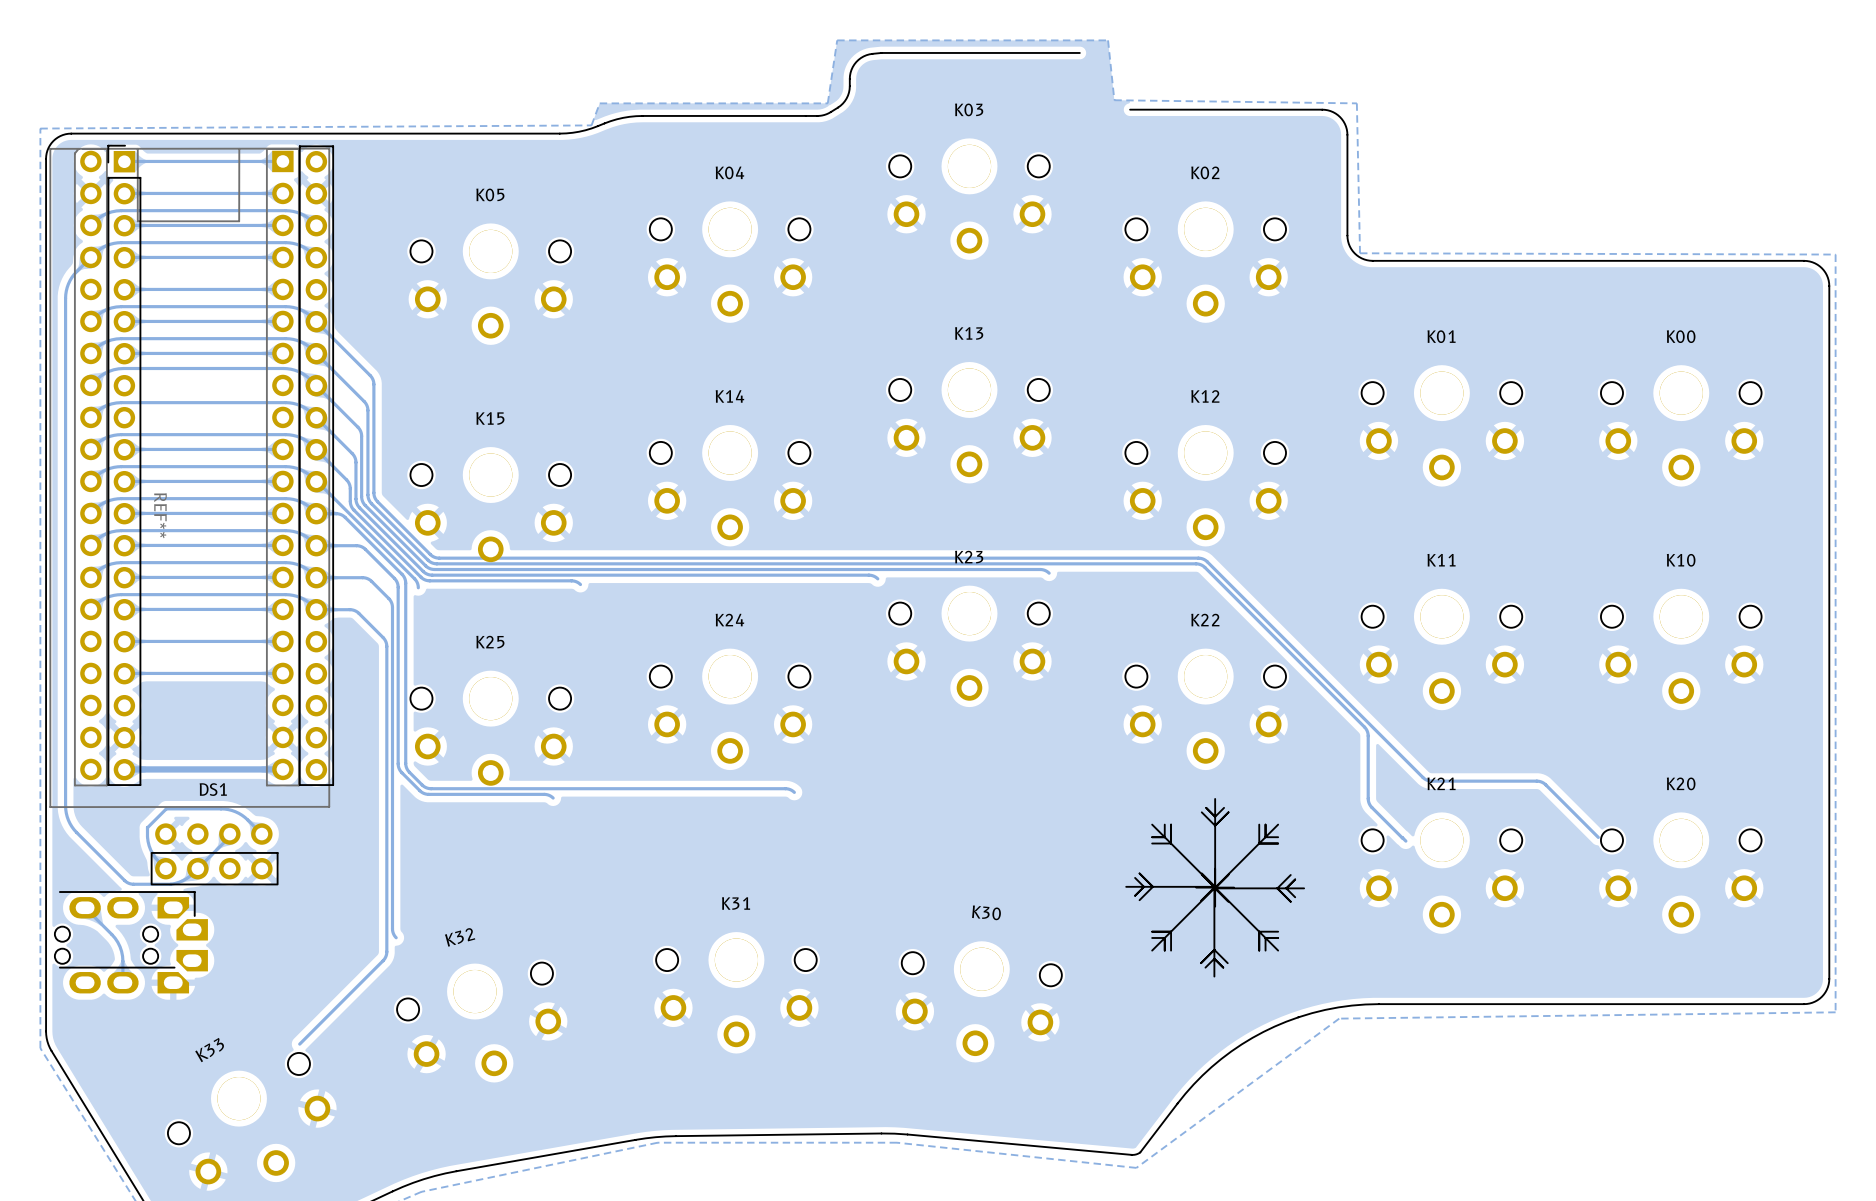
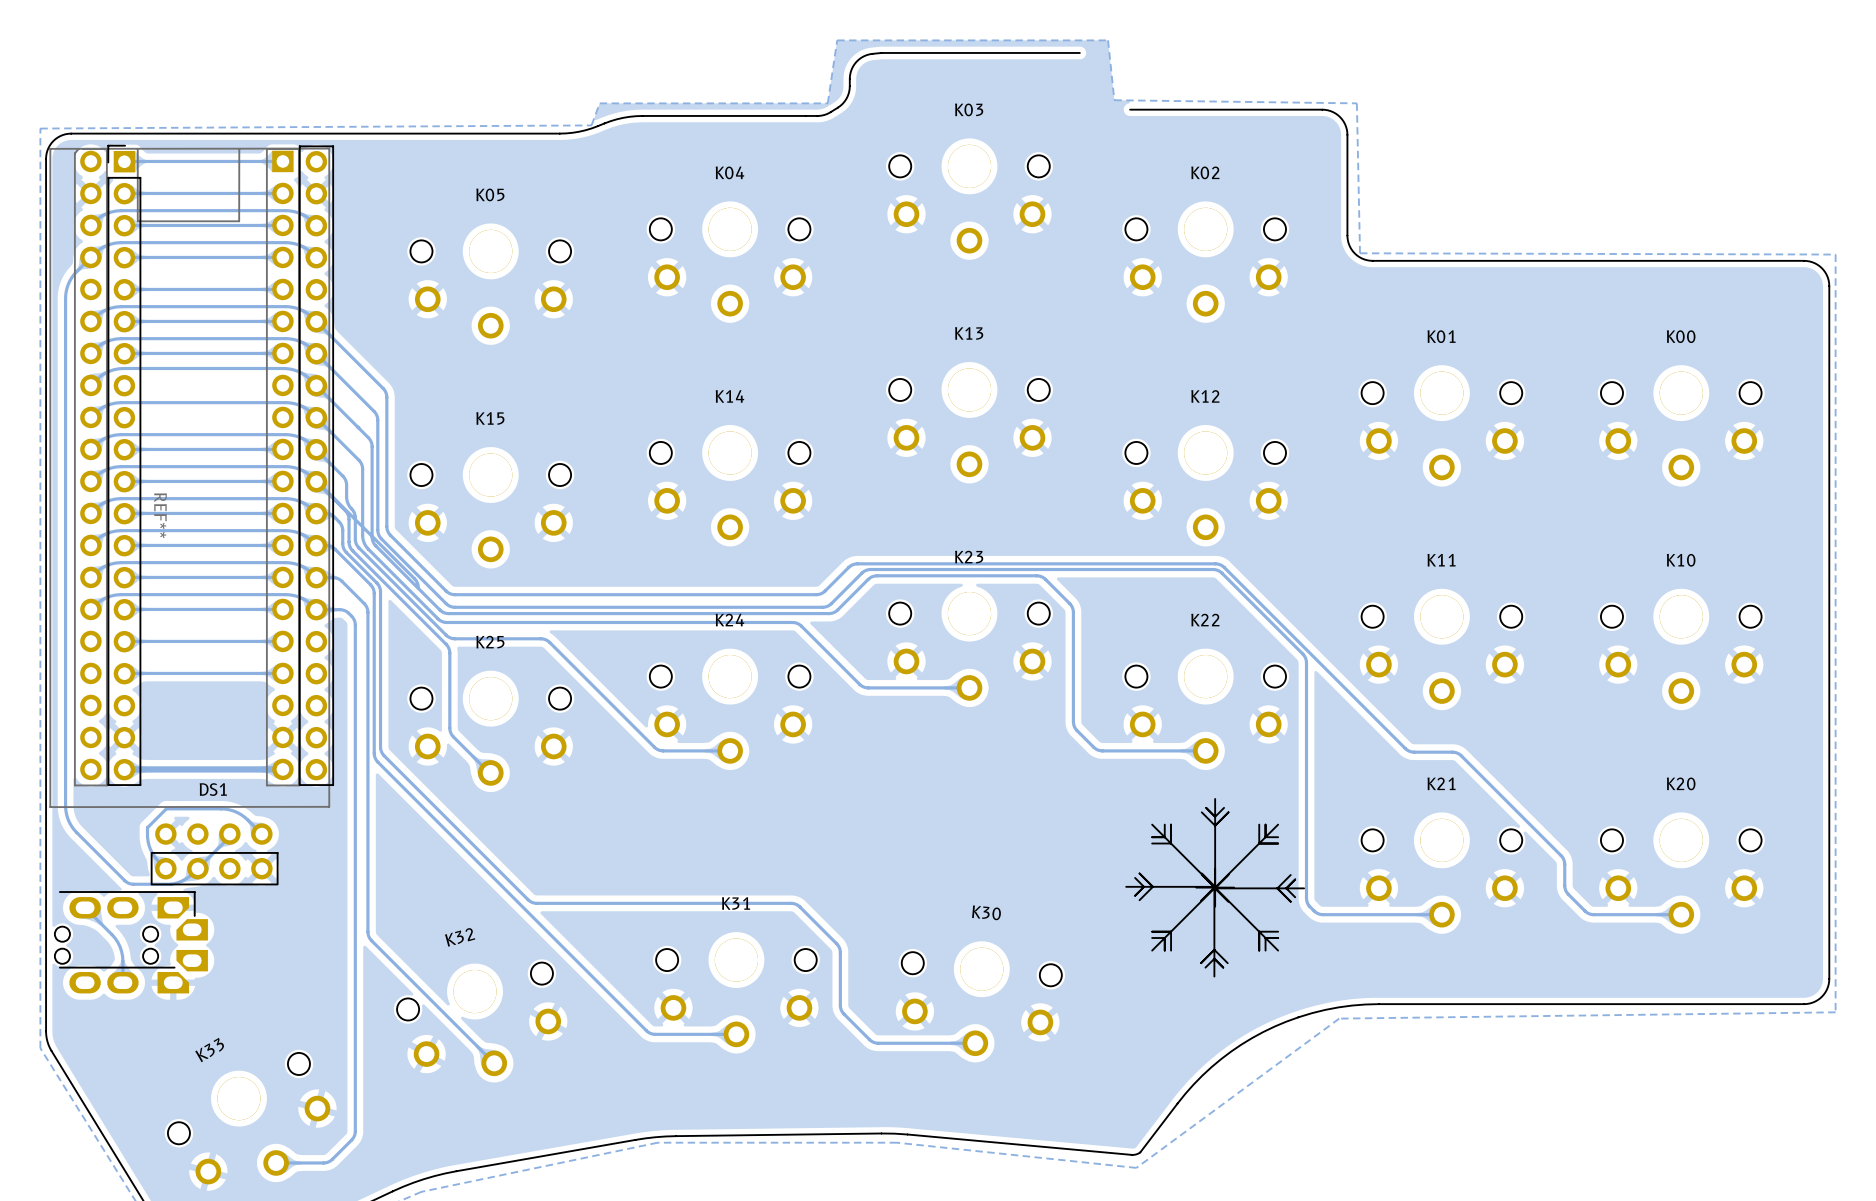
track: (370, 375) (373, 384) (374, 496) (434, 557) (1200, 558) (1207, 561) (1424, 779) (1431, 781) (1540, 781) (1598, 837) -> (370, 375) (383, 389) (386, 396) (387, 531) (450, 593) (817, 594) (824, 591) (849, 566) (857, 563)
track: (364, 401) (367, 410) (368, 499) (433, 563) (857, 563) -> (364, 401) (374, 412) (377, 419) (378, 534) (451, 606) (823, 607) (830, 604) (862, 572) (870, 569)
track: (357, 427) (361, 434) (363, 502) (430, 568) (870, 569) -> (357, 427) (369, 438) (372, 445) (373, 541) (443, 612) (830, 613) (836, 610) (868, 579) (874, 576) (1039, 576) (1045, 579) (1070, 604) (1073, 610) (1073, 721) (1077, 730) (1094, 748) (1100, 750) (1205, 750)
track: (352, 453) (355, 461) (355, 498) (358, 505) (423, 571) (429, 574) (868, 575) (877, 578) -> (352, 453) (360, 462) (362, 467) (362, 535) (365, 544) (442, 621) (793, 622) (801, 626) (863, 686) (969, 687)
track: (342, 476) (349, 485) (350, 502) (353, 509) (425, 579) (571, 580) (580, 584) -> (342, 476) (346, 482) (347, 501) (355, 515) (355, 540) (357, 546) (448, 636) (455, 638) (545, 639) (656, 748) (663, 750) (730, 750)
track: none -> (316, 481) (347, 513) (349, 543) (351, 549) (448, 647) (450, 731) (490, 772)
track: (325, 513) (338, 513) (344, 516) (404, 578) (405, 764) (408, 771) (425, 787) (785, 788) (794, 792) -> (325, 513) (332, 515) (340, 523) (344, 550) (376, 582) (380, 589) (382, 752) (528, 900) (536, 903) (794, 903) (838, 946) (840, 1008) (870, 1040) (878, 1043) (975, 1043)
track: (326, 545) (362, 547) (397, 583) (398, 763) (401, 771) (420, 791) (426, 794) (544, 794) (553, 798) -> (326, 545) (335, 549) (370, 584) (373, 591) (374, 753) (377, 761) (647, 1031) (655, 1034) (736, 1034)
track: (1196, 563) (1204, 567) (1365, 727) (1368, 734) (1369, 803) (1405, 841) -> (1196, 563) (1216, 563) (1223, 566) (1407, 750) (1414, 752) (1453, 752) (1460, 755) (1561, 856) (1564, 863) (1565, 890) (1586, 912) (1593, 914) (1681, 914)
track: (1040, 569) (1049, 573) -> (1040, 569) (1213, 569) (1221, 572) (1305, 659) (1306, 898) (1308, 904) (1316, 912) (1321, 914) (1441, 914)
track: (333, 577) (367, 578) (388, 598) (392, 605) (392, 928) (396, 937) -> (333, 577) (342, 581) (365, 604) (367, 611) (368, 935) (494, 1063)
track: (339, 609) (352, 609) (357, 612) (383, 638) (386, 645) (386, 953) (383, 960) (299, 1044) -> (339, 609) (345, 611) (351, 616) (355, 625) (355, 1132) (351, 1140) (328, 1162) (276, 1162)

